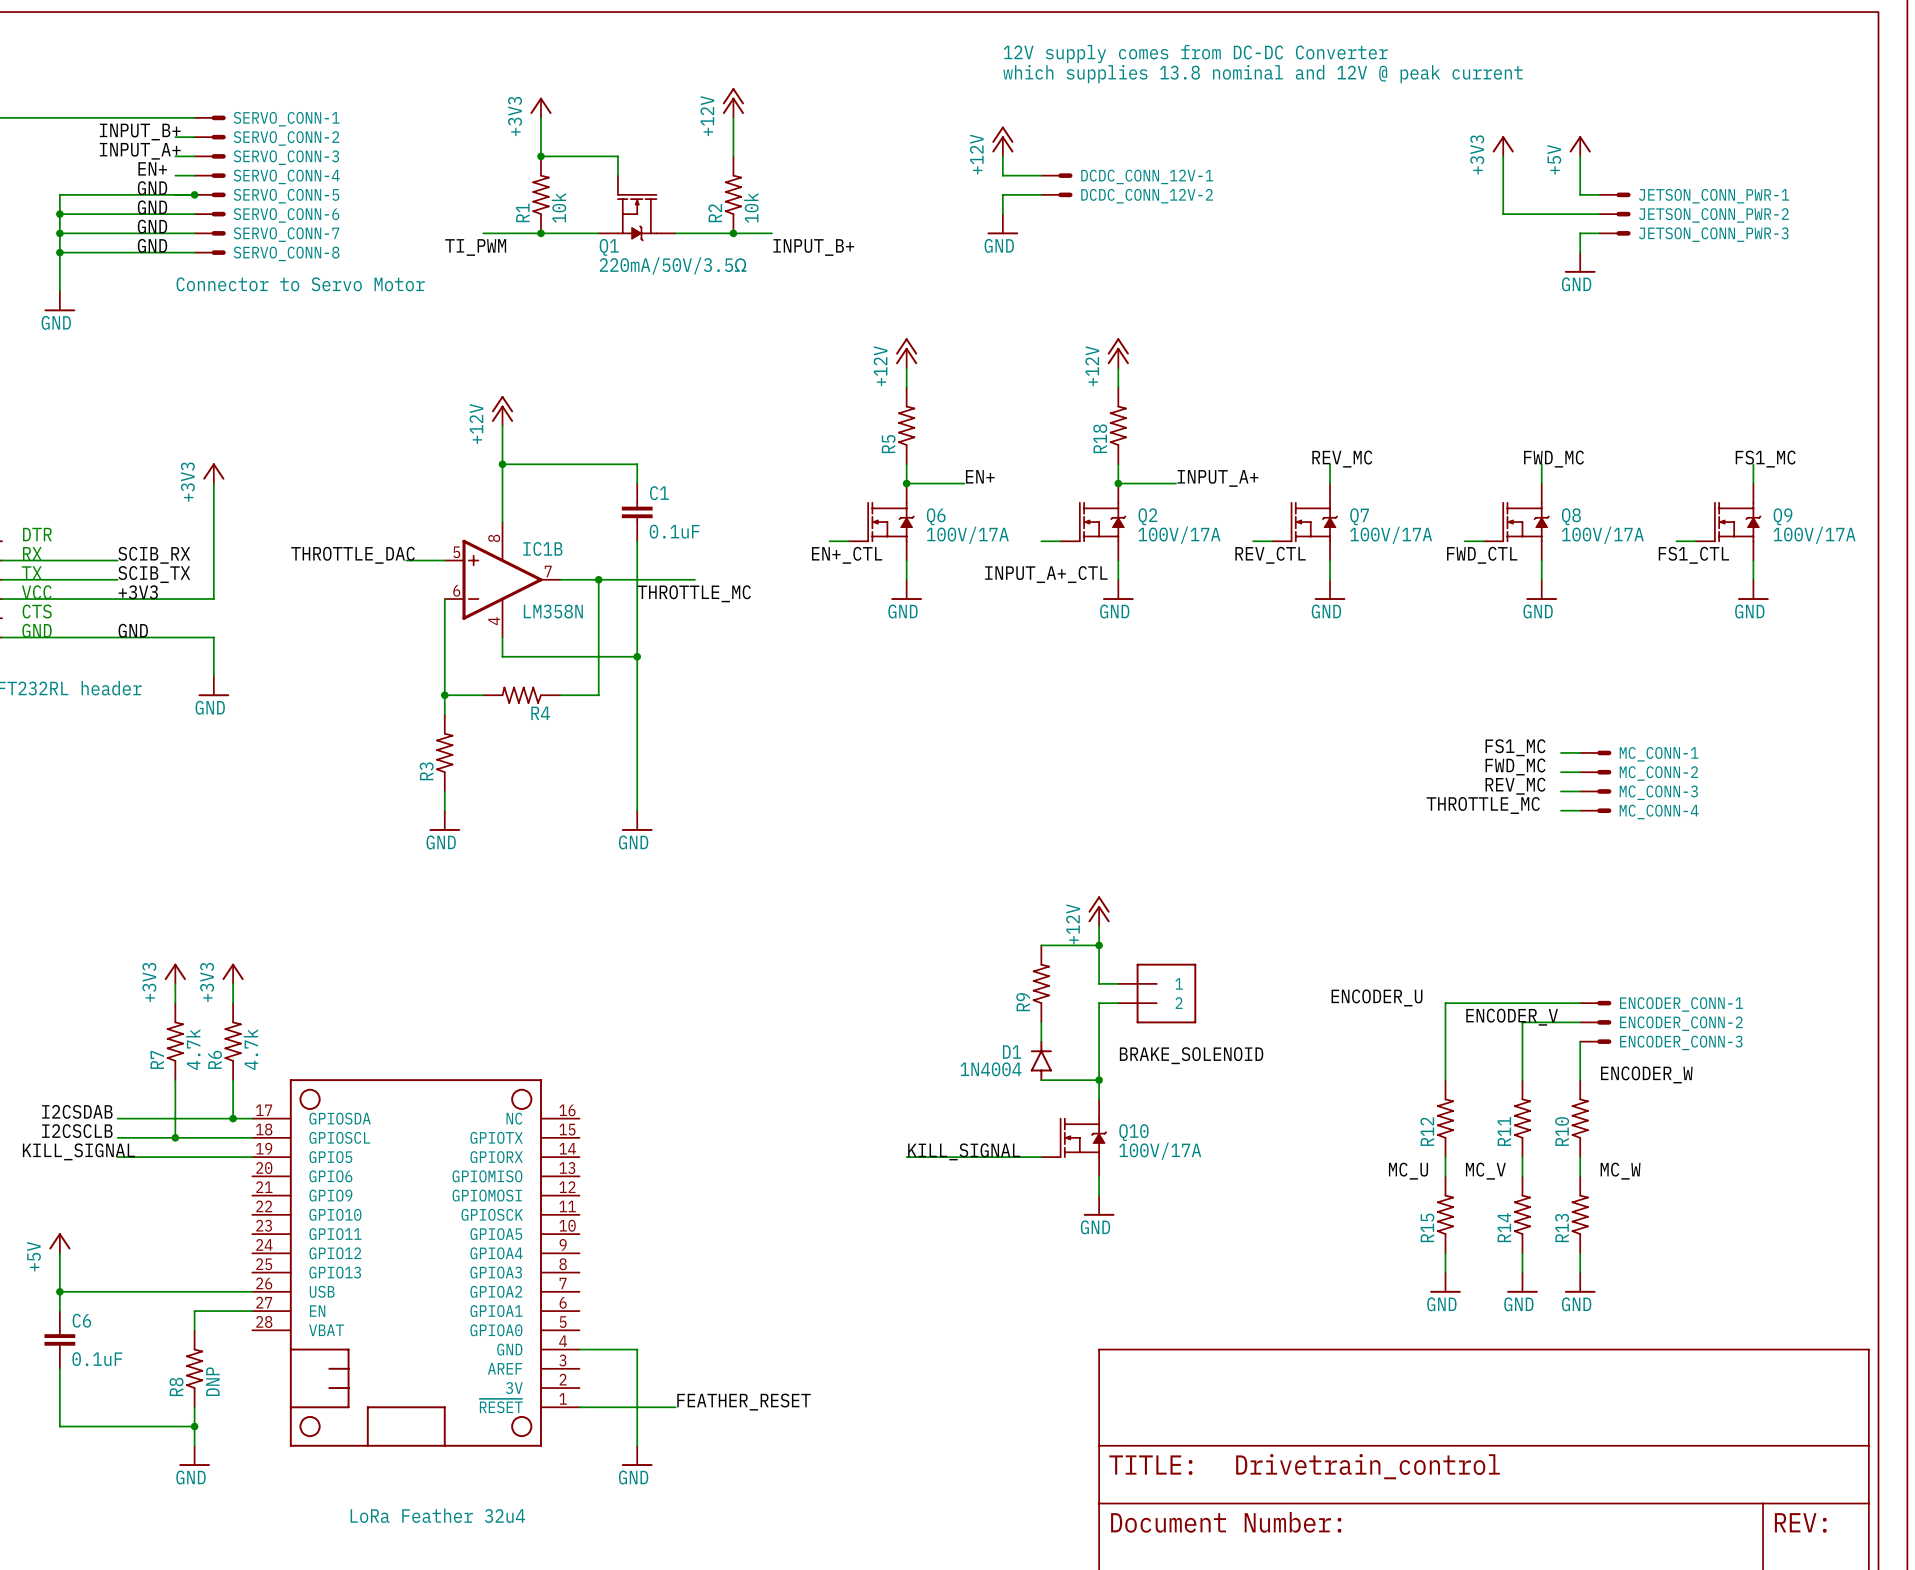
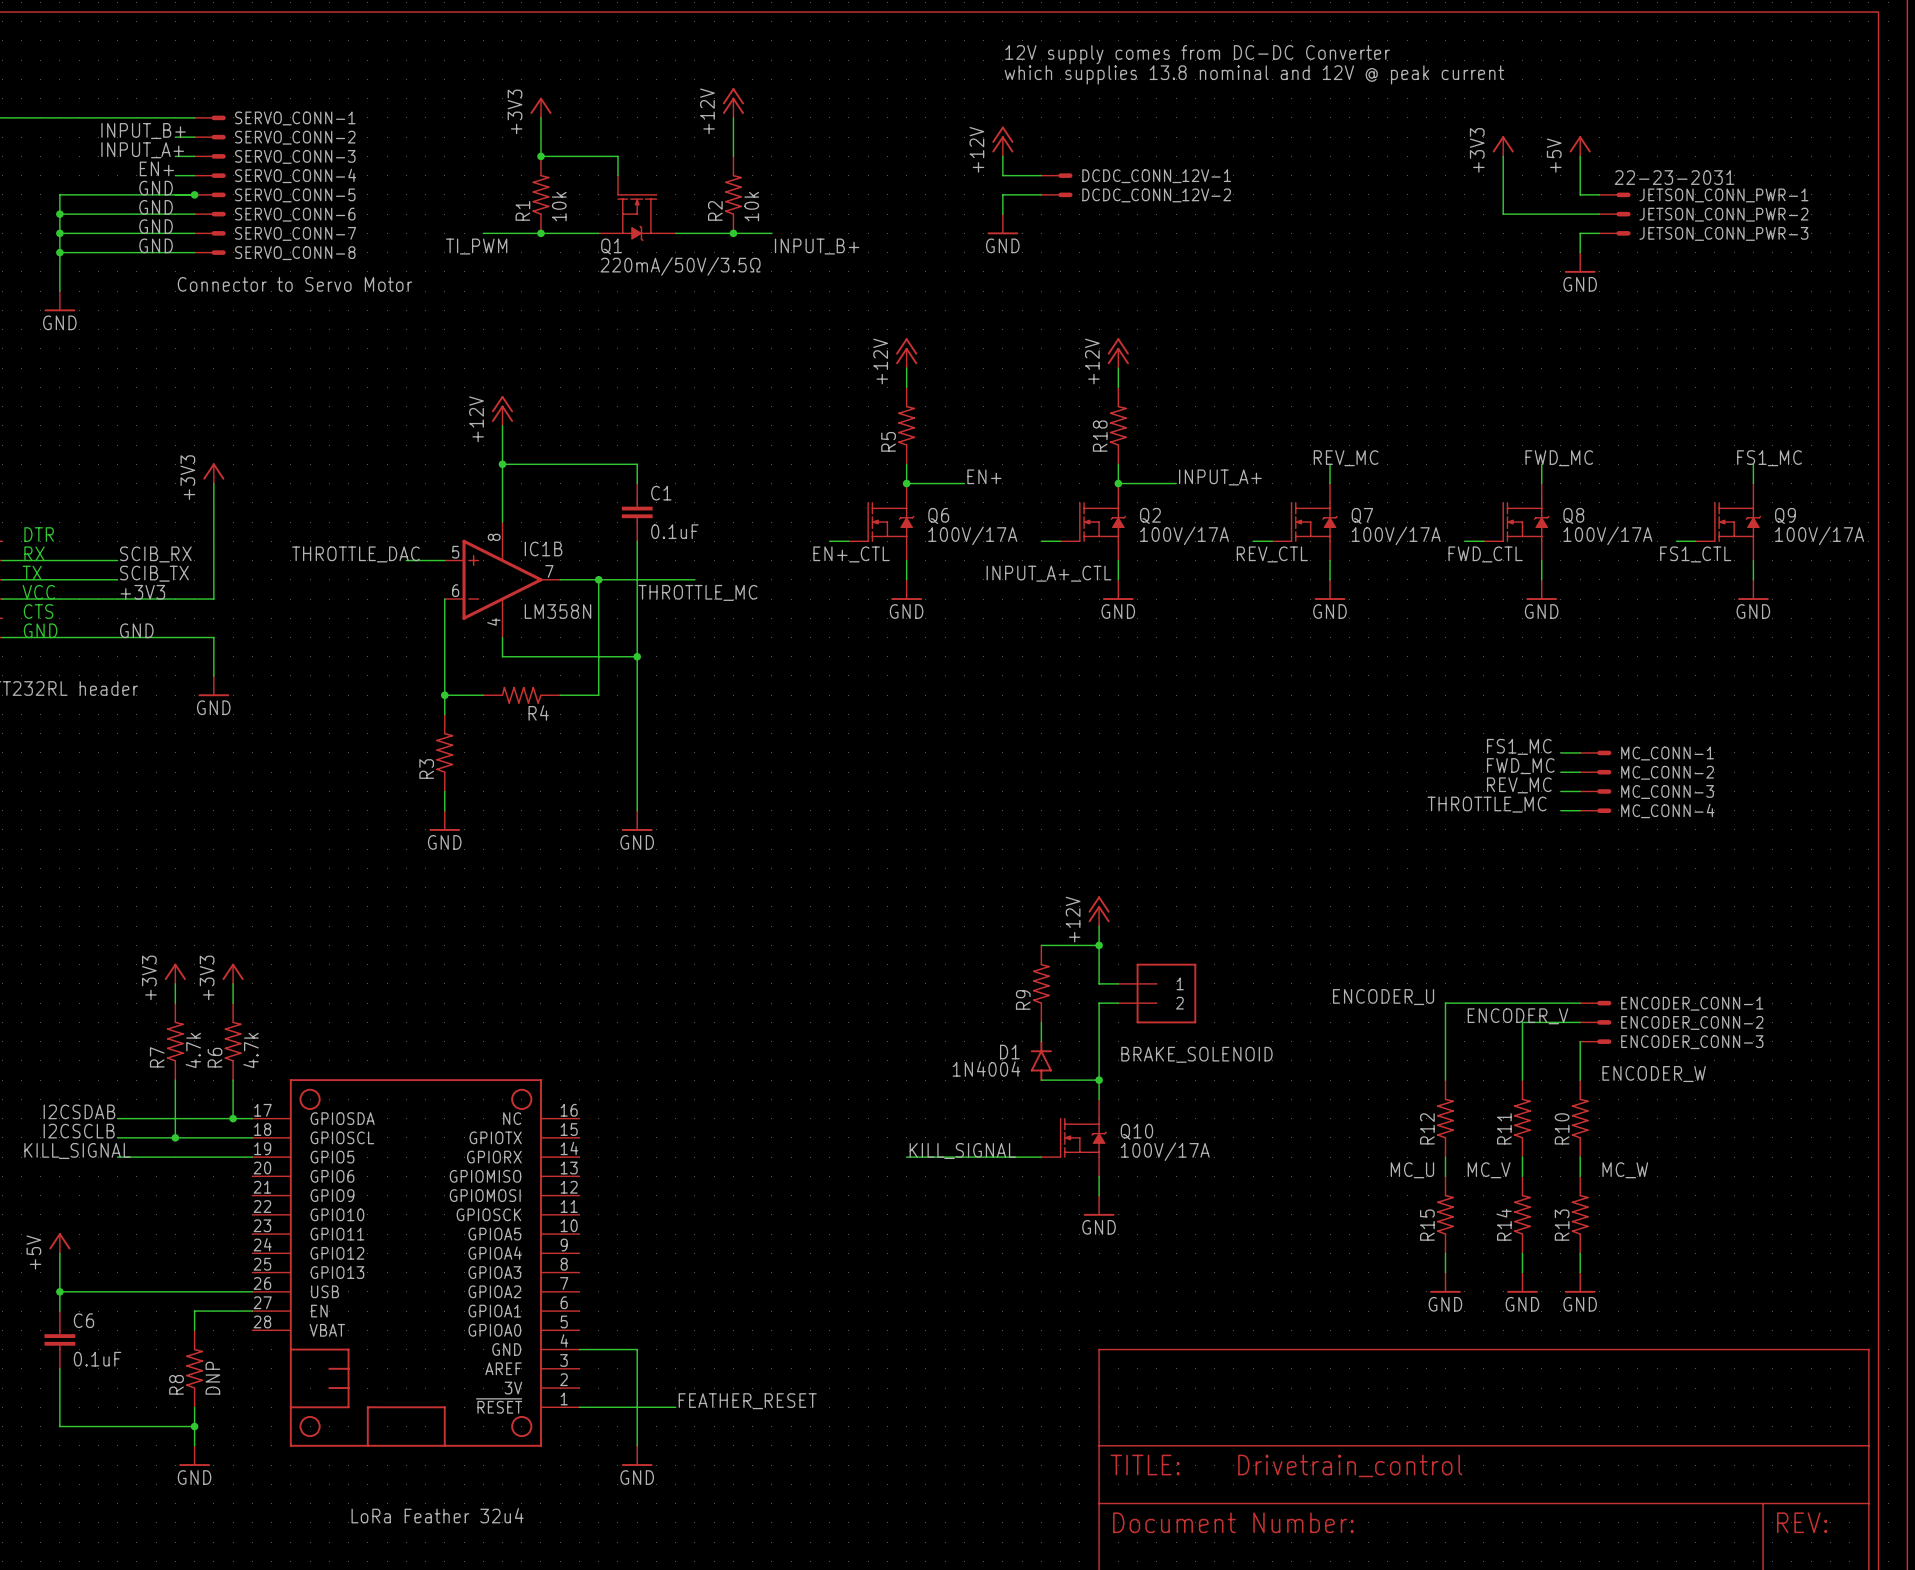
JETSON_CONN_PWR-1 value: none -> 22-23-2031 (1674, 177)

